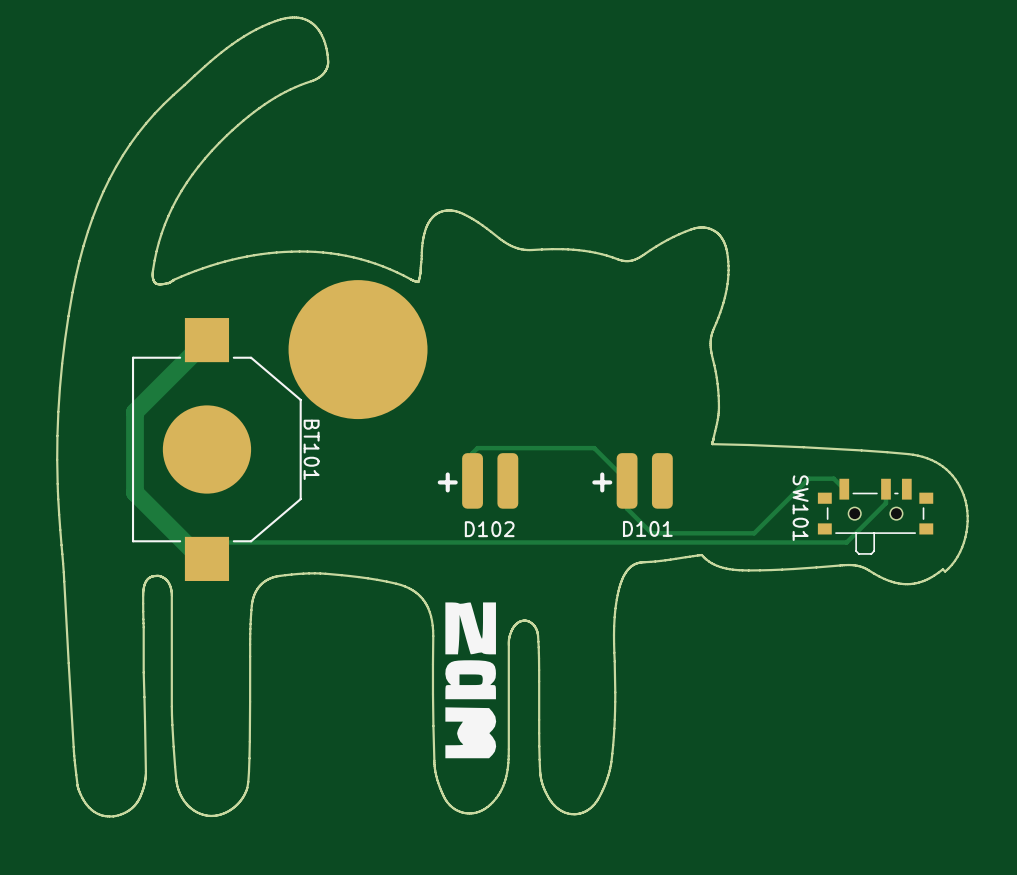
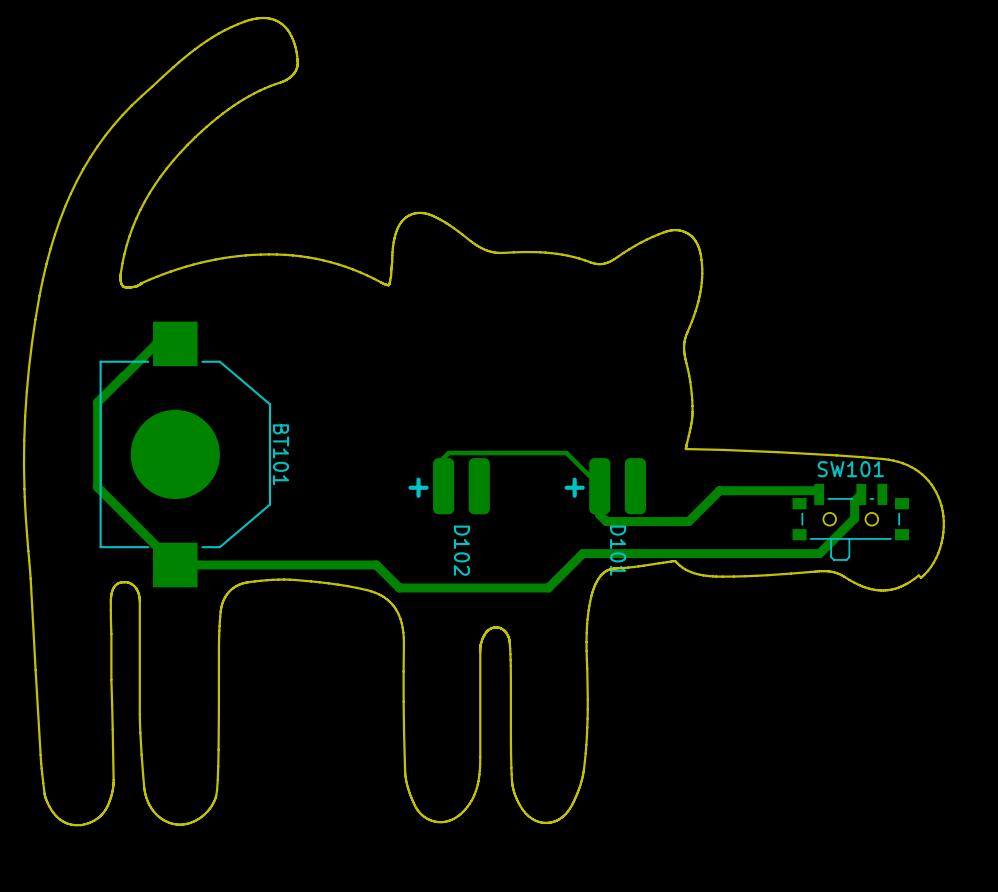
track: (206, 340) (134, 412) (134, 492) (201, 558) (206, 558) (223, 542) (846, 542) (885, 503) (885, 489) -> (175, 343) (156, 343) (97, 402) (97, 487) (175, 565) (376, 565) (399, 587) (548, 587) (582, 553) (819, 553) (854, 518) (854, 501) (861, 494)
part: (358, 349) -> none
track: (840, 485) (833, 478) (808, 478) (754, 533) (651, 533) (627, 508) -> (815, 490) (719, 490) (688, 521) (606, 521) (599, 514)
SW101 name rotation: 0° (800, 508) -> 90° counterclockwise (850, 469)
SW101 name position: SW101 (800, 508) -> SW101 (850, 469)
D101 name rotation: 0° (647, 528) -> 90° clockwise (618, 550)
D102 name rotation: 0° (489, 529) -> 90° clockwise (461, 550)
drawing: [445, 602, 497, 759] -> none

